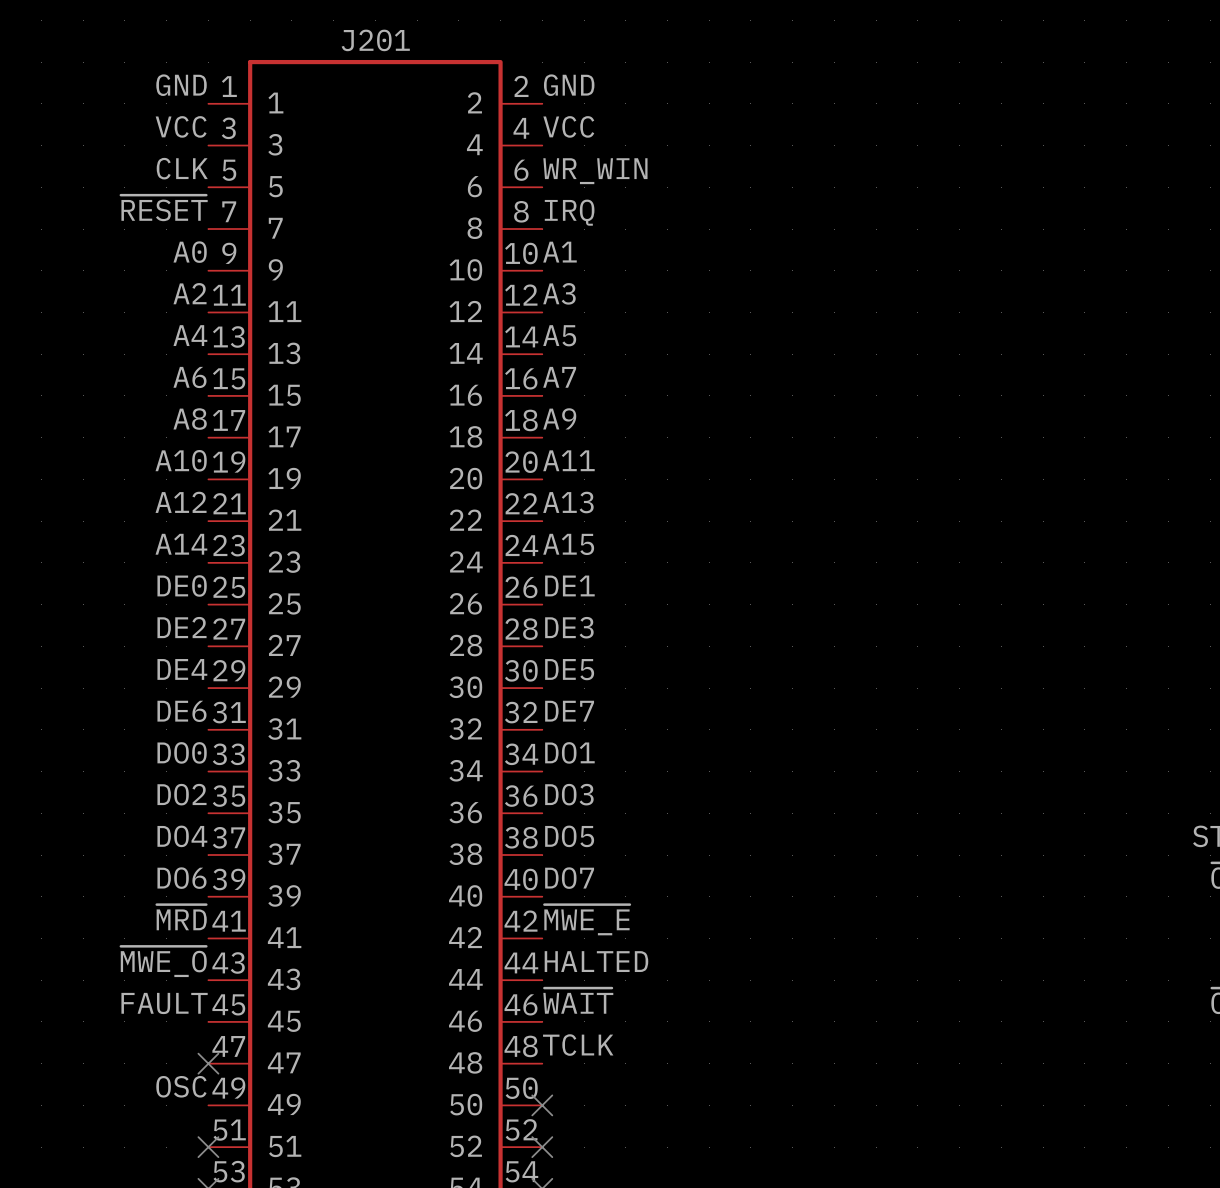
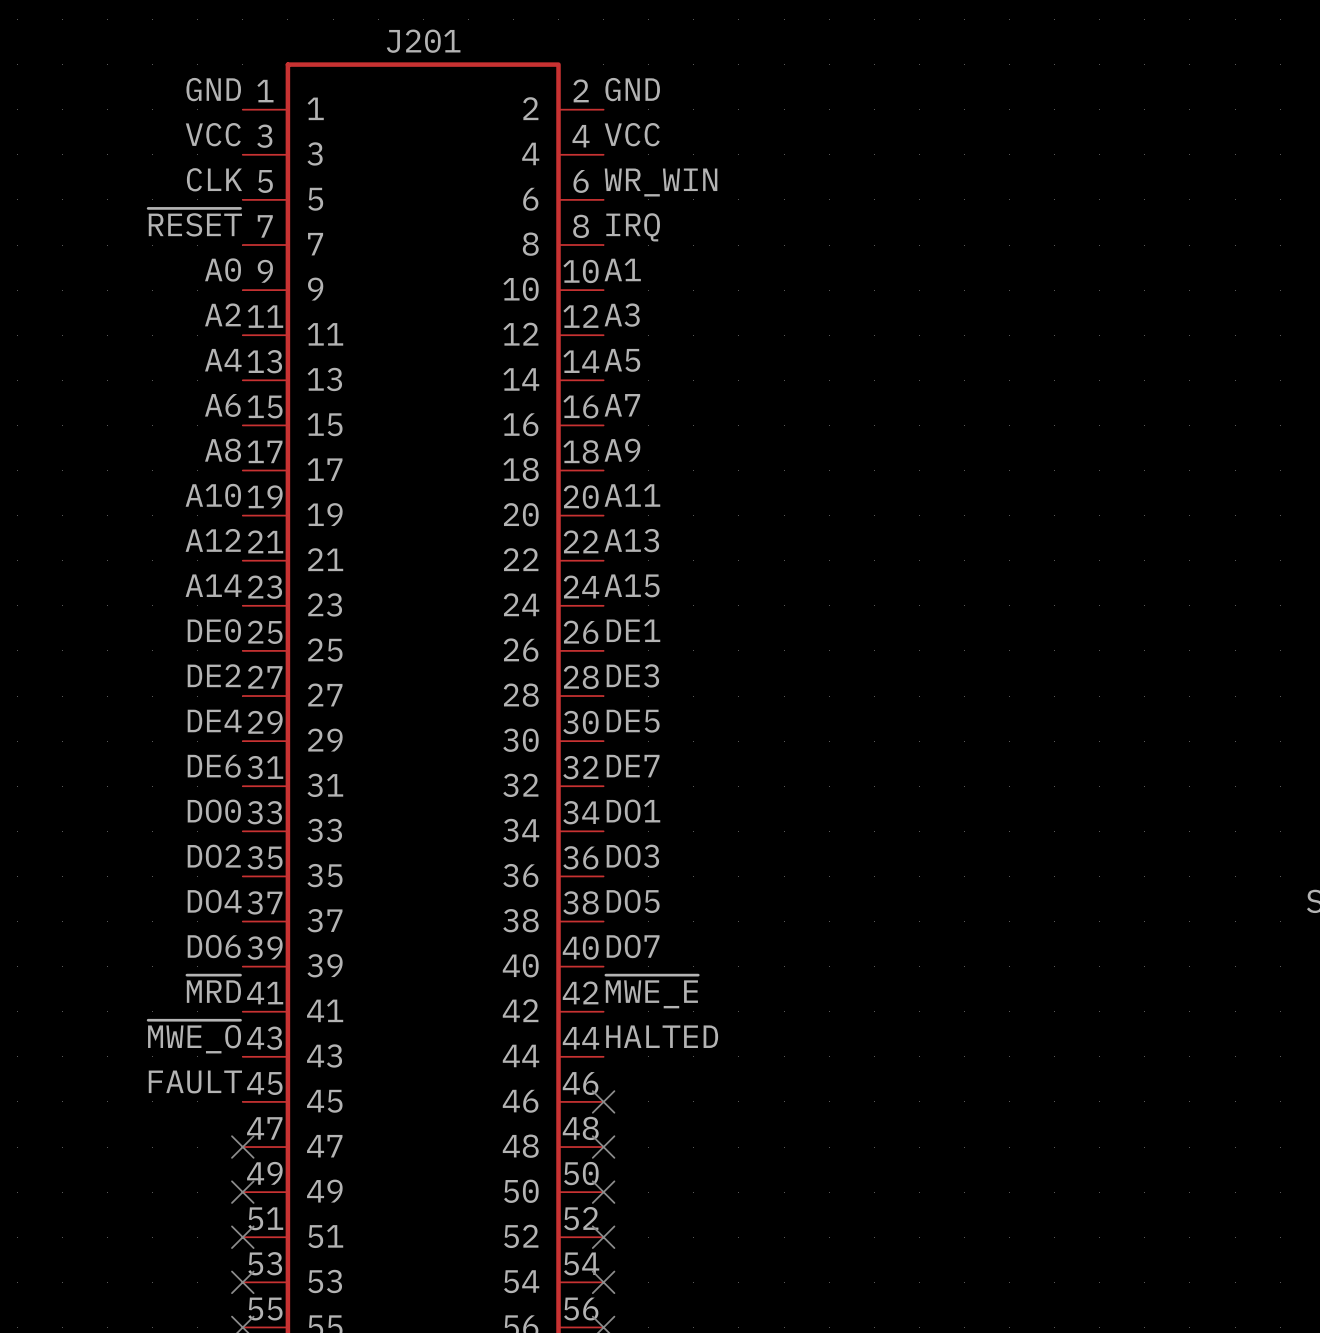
label: ~{WAIT} (578, 1000) -> none
no-connect mark: none -> (603, 1101)
label: TCLK (578, 1045) -> none
no-connect mark: none -> (603, 1147)
label: OSC (181, 1086) -> none
no-connect mark: none -> (242, 1192)

